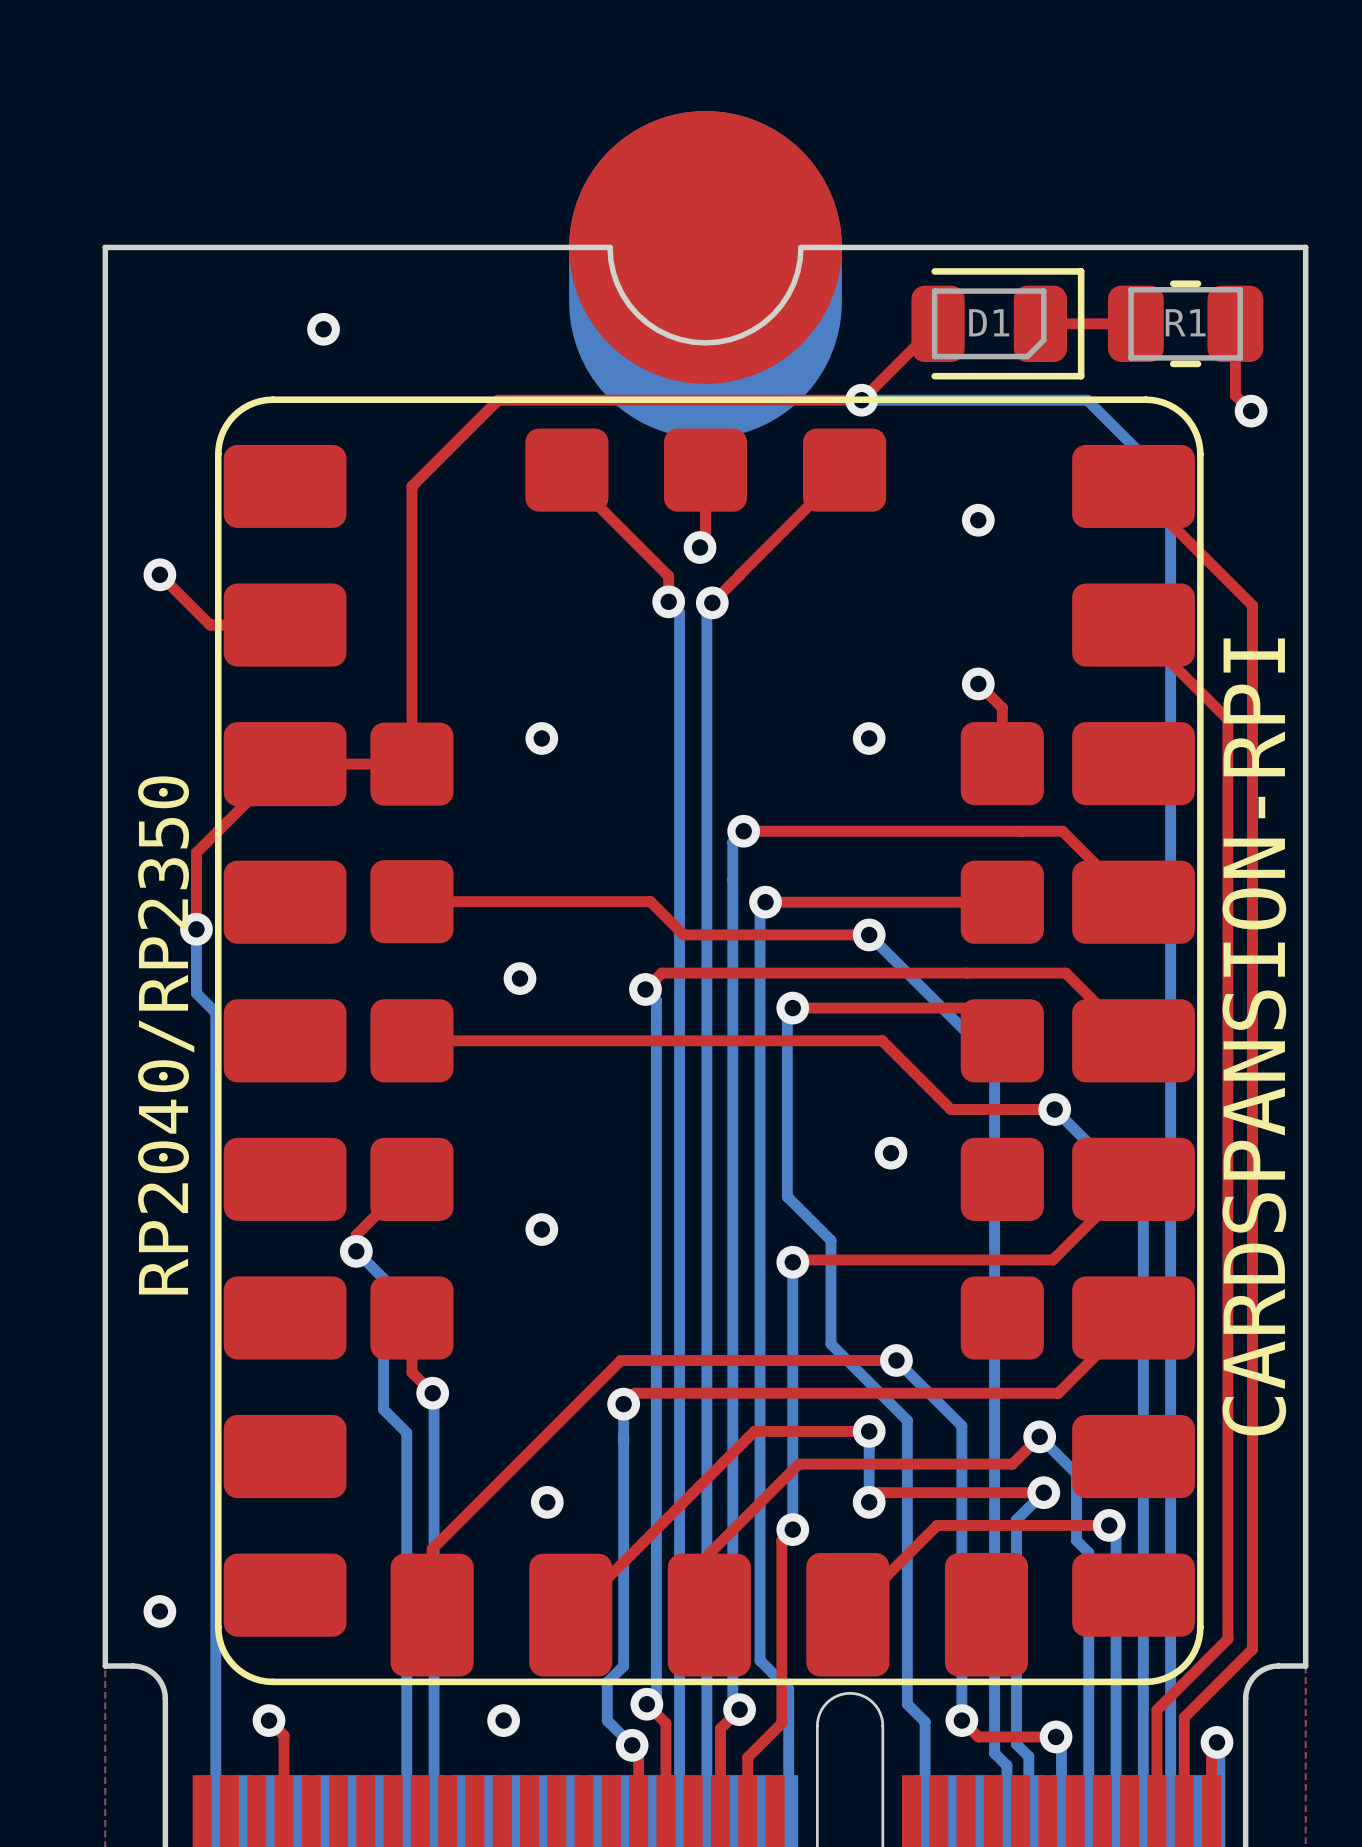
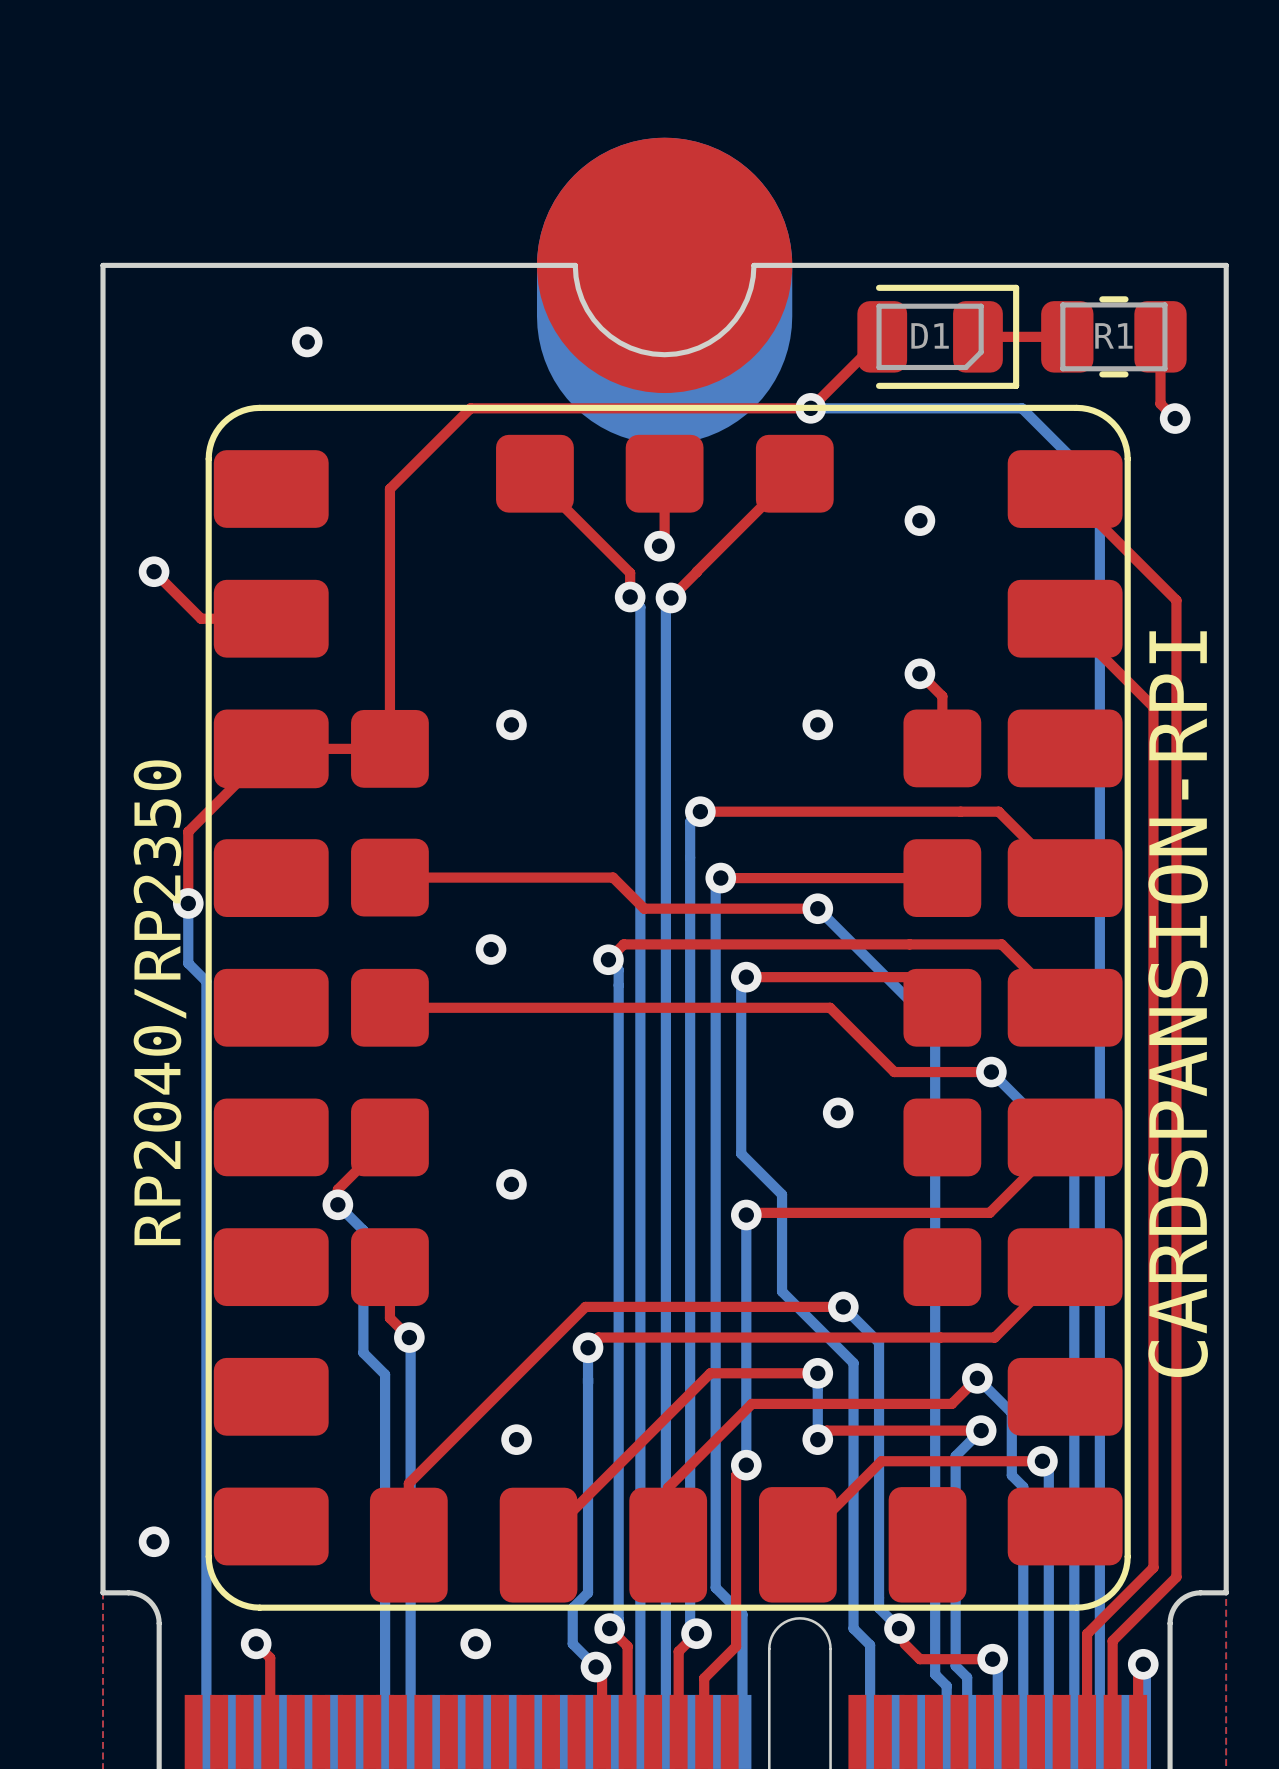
bottom track: (934, 1398) (961, 1425) (961, 1720) -> (879, 1342) (879, 1608) (899, 1628)
via position: (961, 1720) -> (899, 1628)

